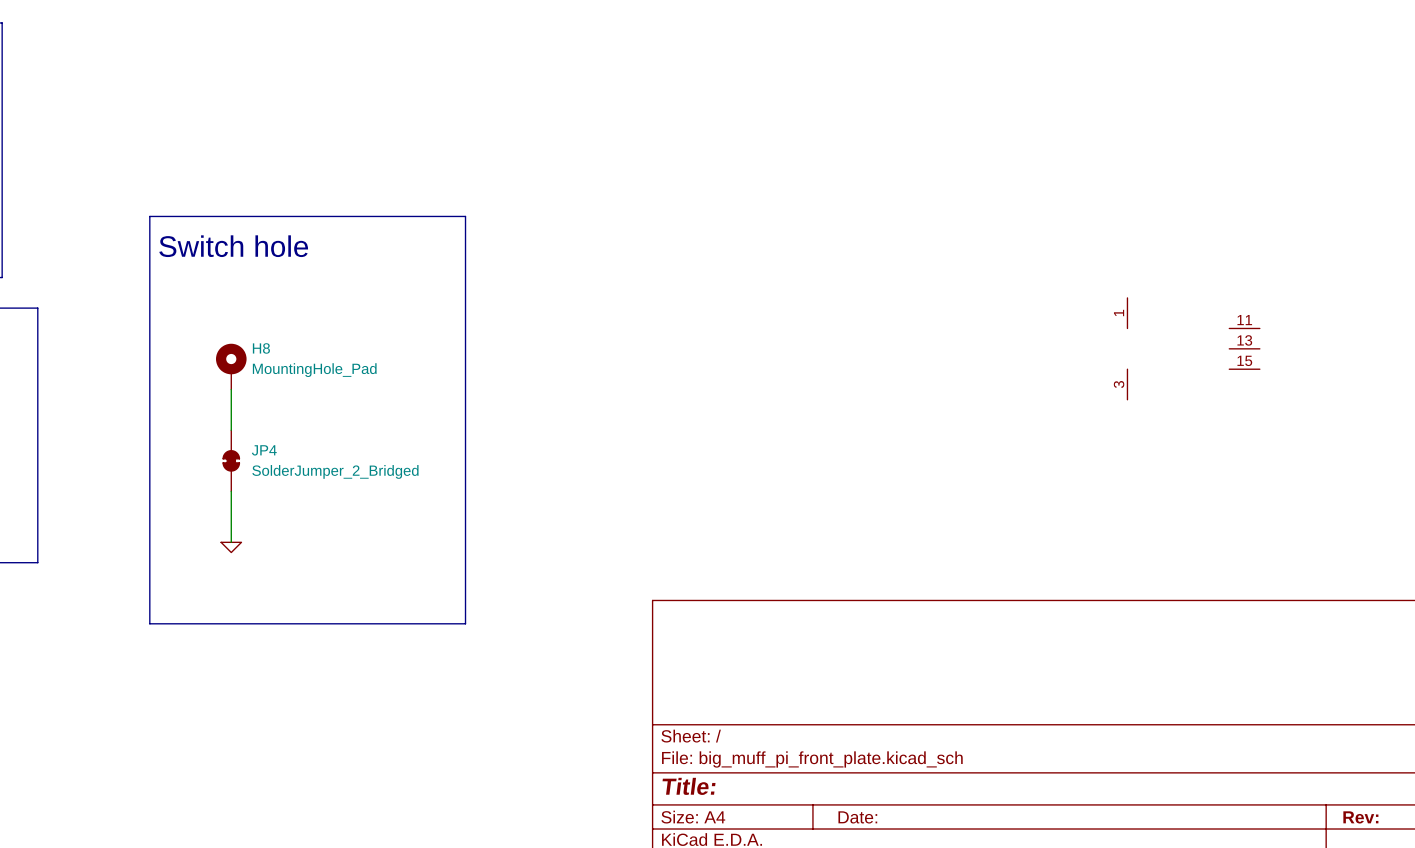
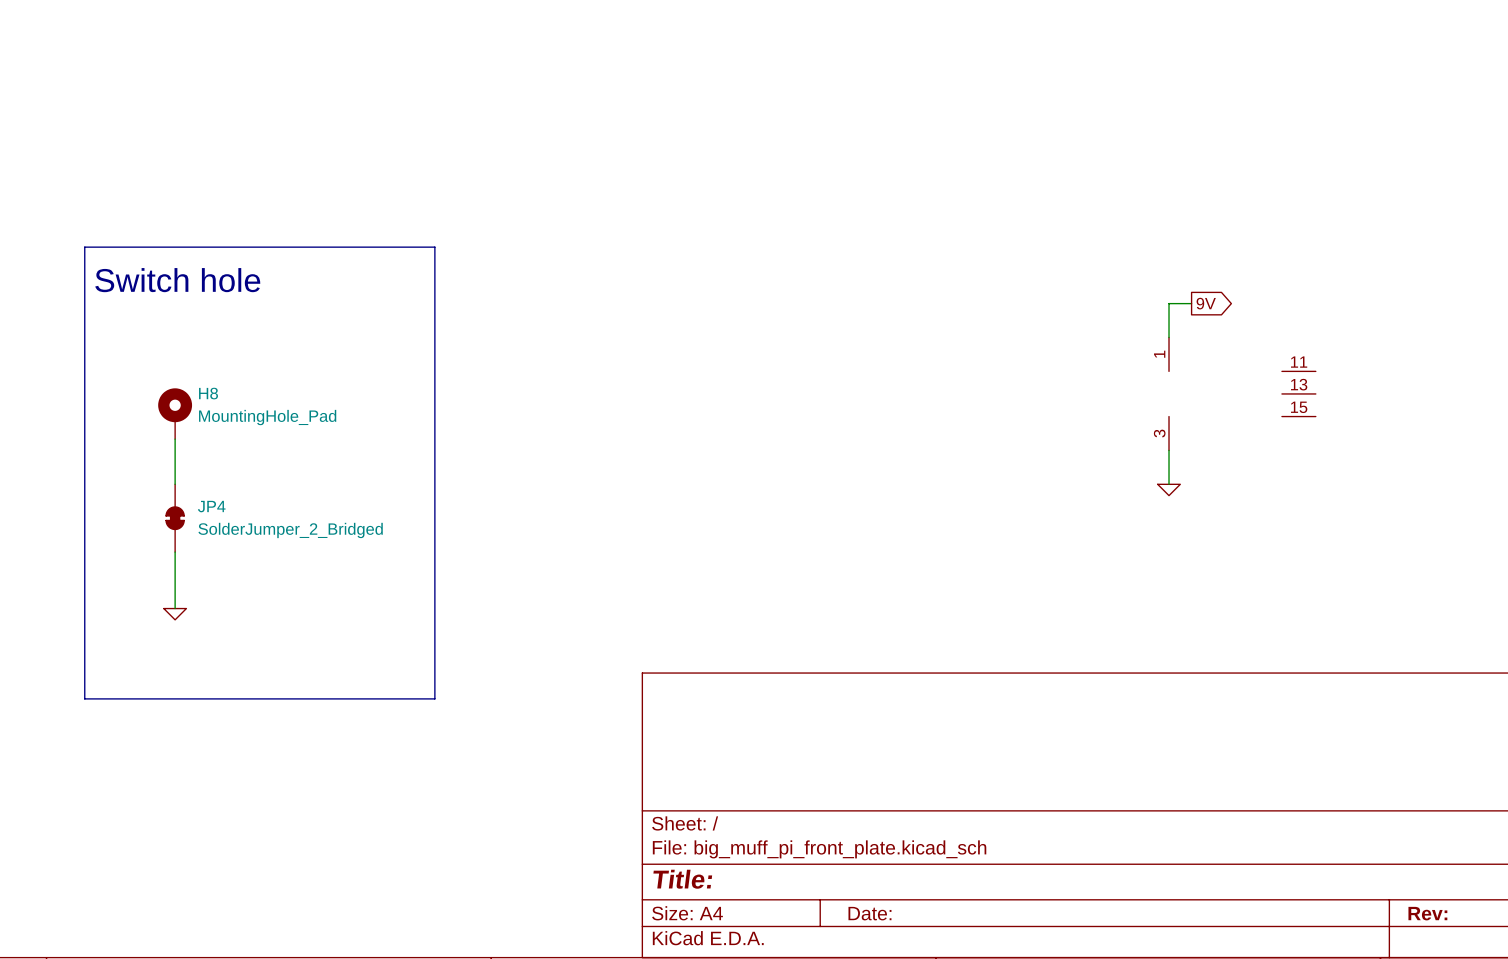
wire: none -> (1191, 303) (1169, 303) (1169, 337)
global label: none -> 9V (1206, 303)
wire: none -> (1169, 450) (1169, 484)
power symbol: none -> (1169, 489)

